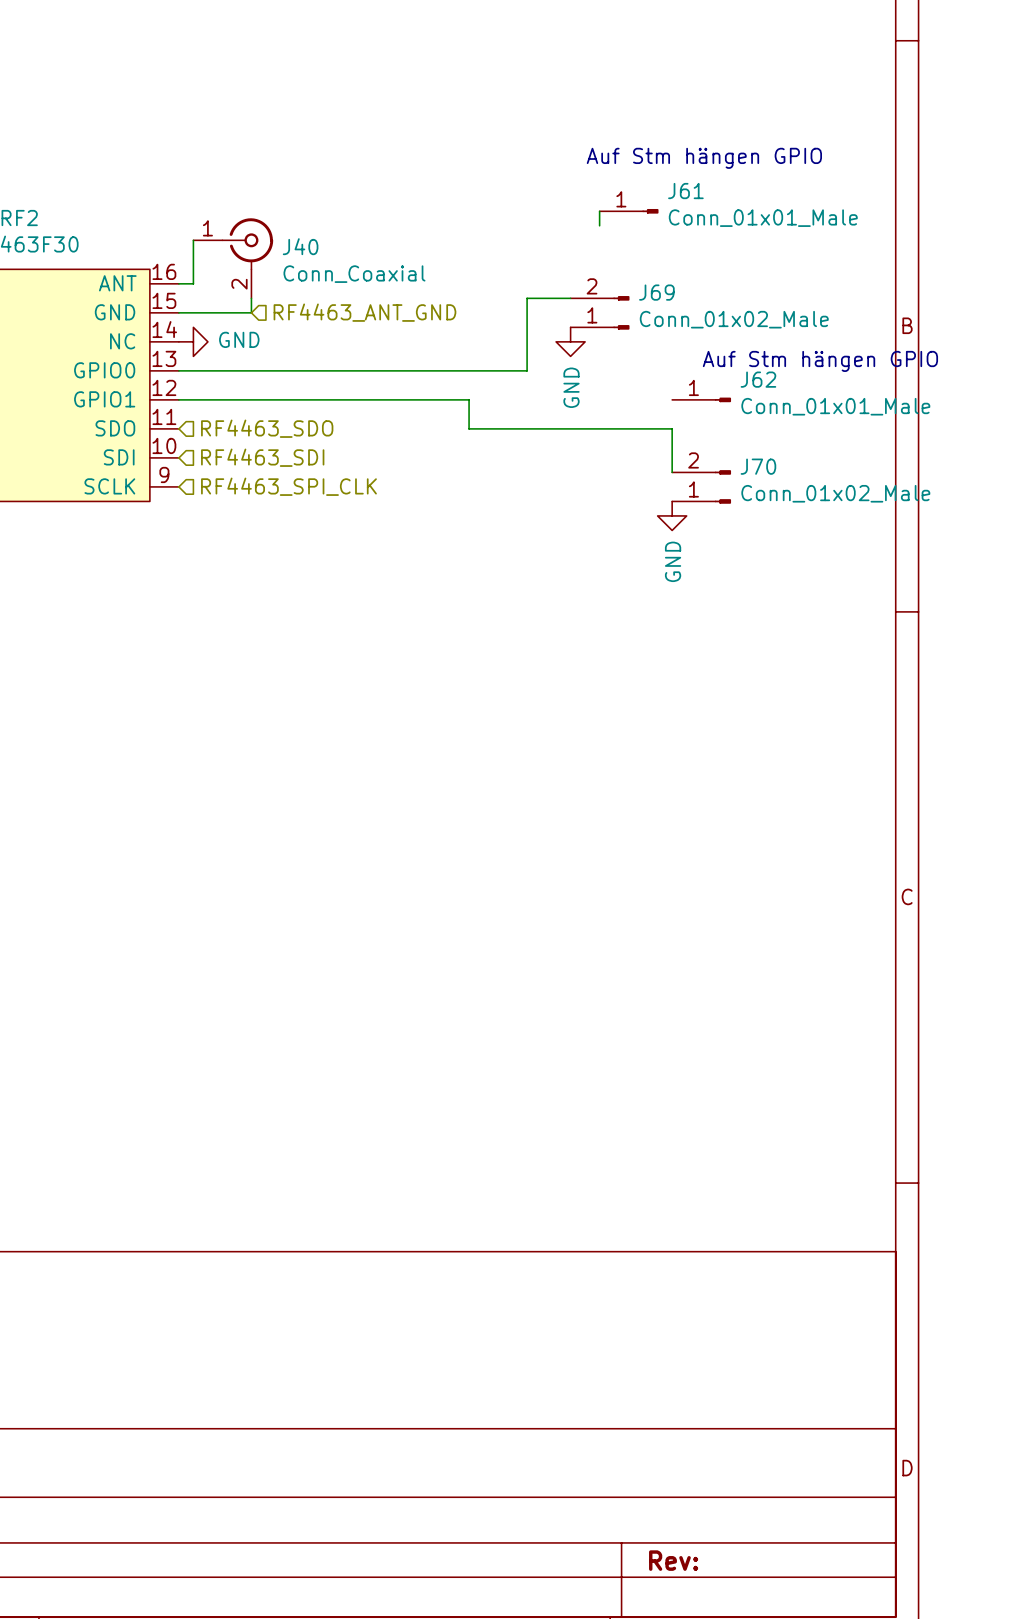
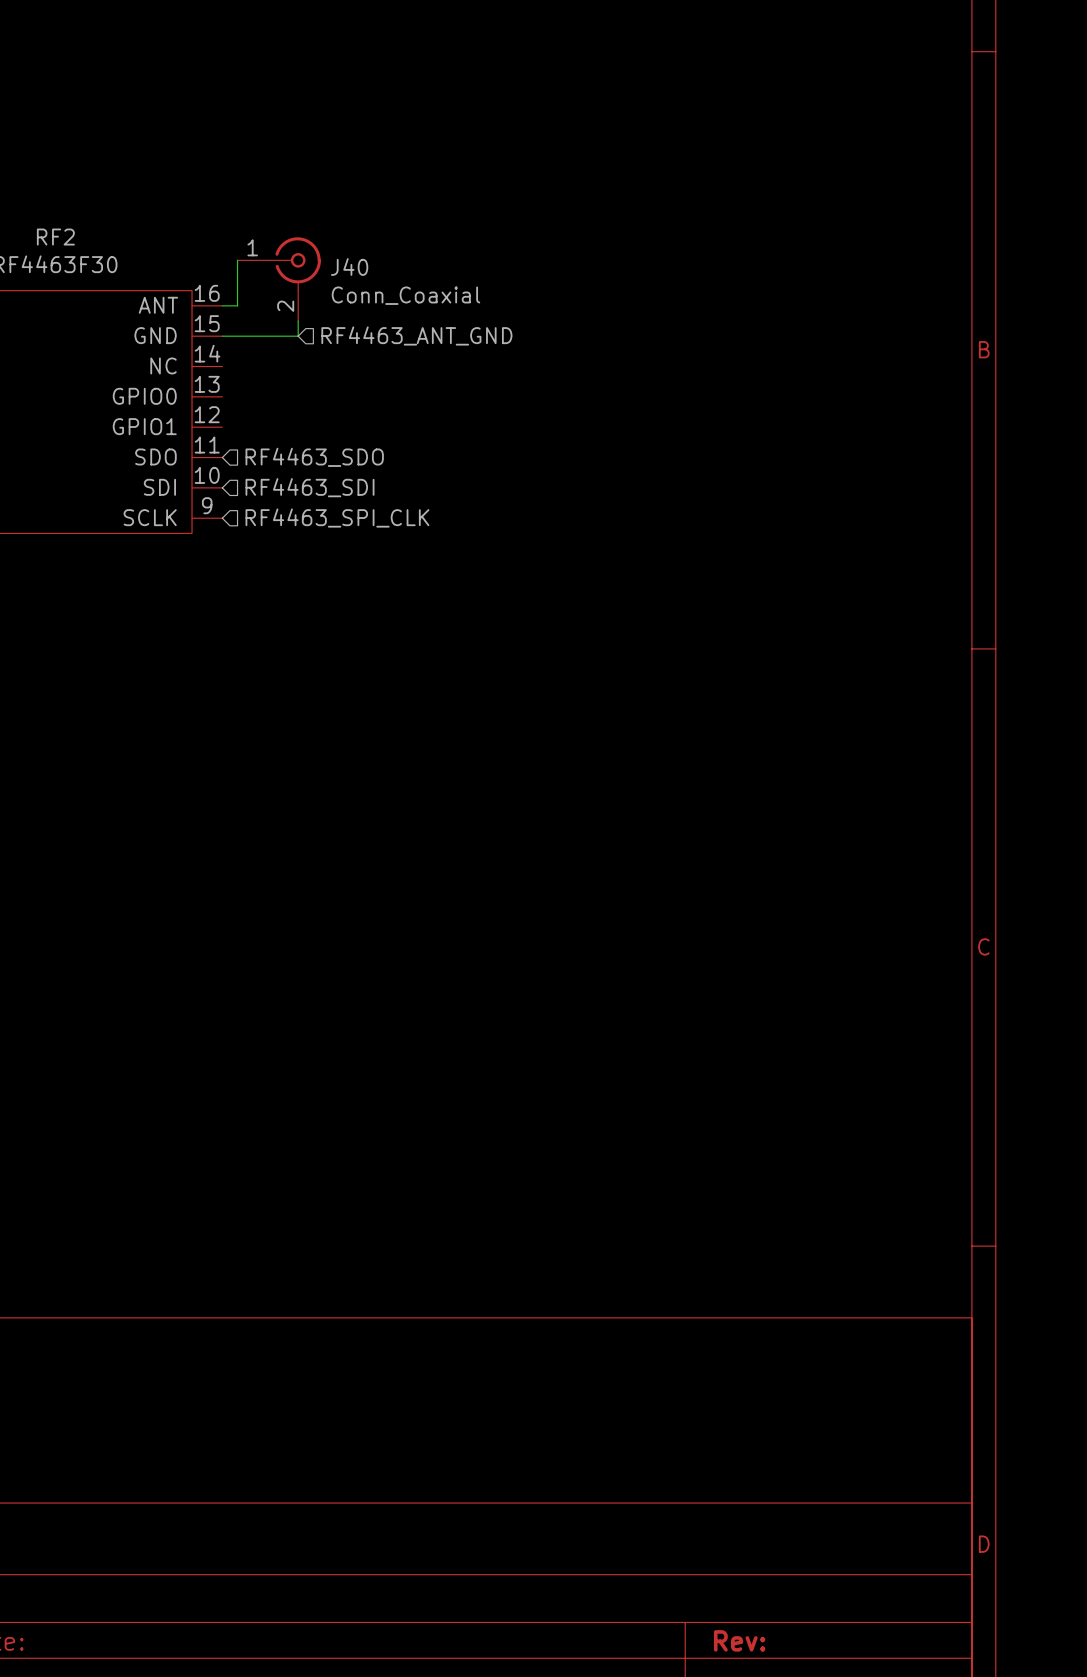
text: Auf Stm hängen GPIO (704, 158) -> none
wire: (599, 211) (599, 225) -> none
J61: Conn_01x01_Male (629, 211) -> none
wire: (570, 298) (527, 298) (527, 370) (178, 370) -> none
J69: Conn_01x02_Male (600, 312) -> none
power symbol: GND (193, 341) -> none
power symbol: GND (570, 341) -> none
text: Auf Stm hängen GPIO (820, 361) -> none
wire: (178, 399) (469, 399) (469, 428) (672, 428) (672, 472) -> none
J62: Conn_01x01_Male (701, 399) -> none
J70: Conn_01x02_Male (701, 486) -> none
power symbol: GND (672, 515) -> none

